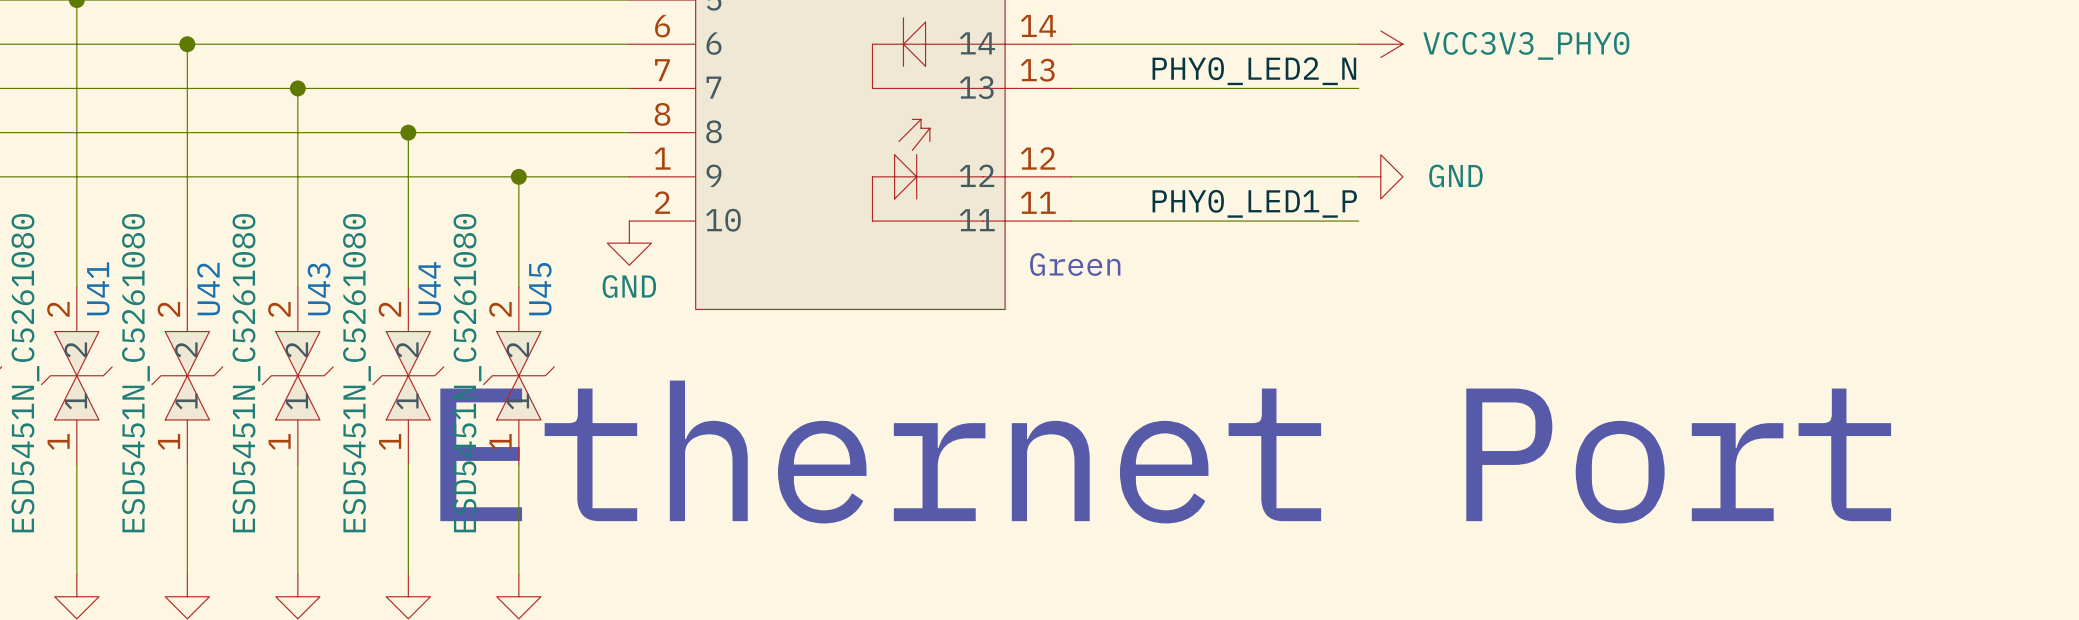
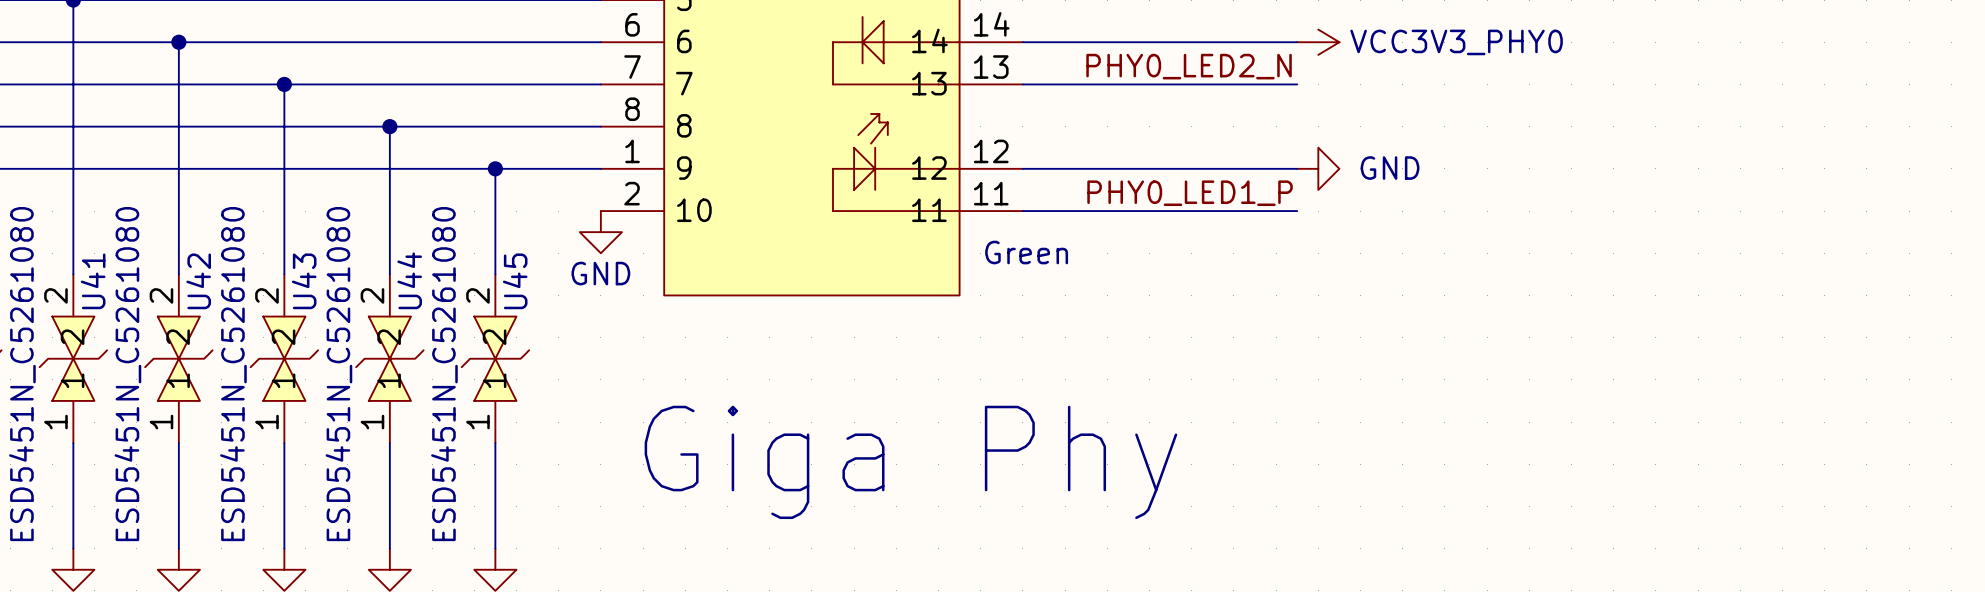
text: Ethernet Port (1165, 452) -> none
text: none -> Giga Phy (910, 462)

